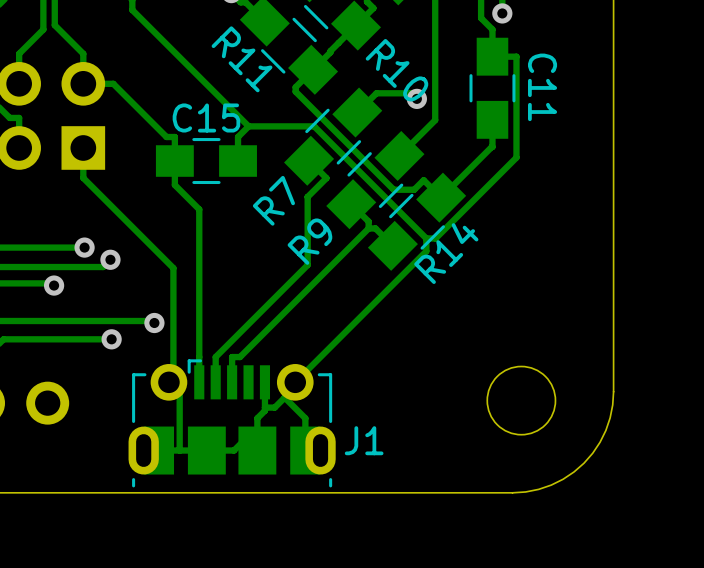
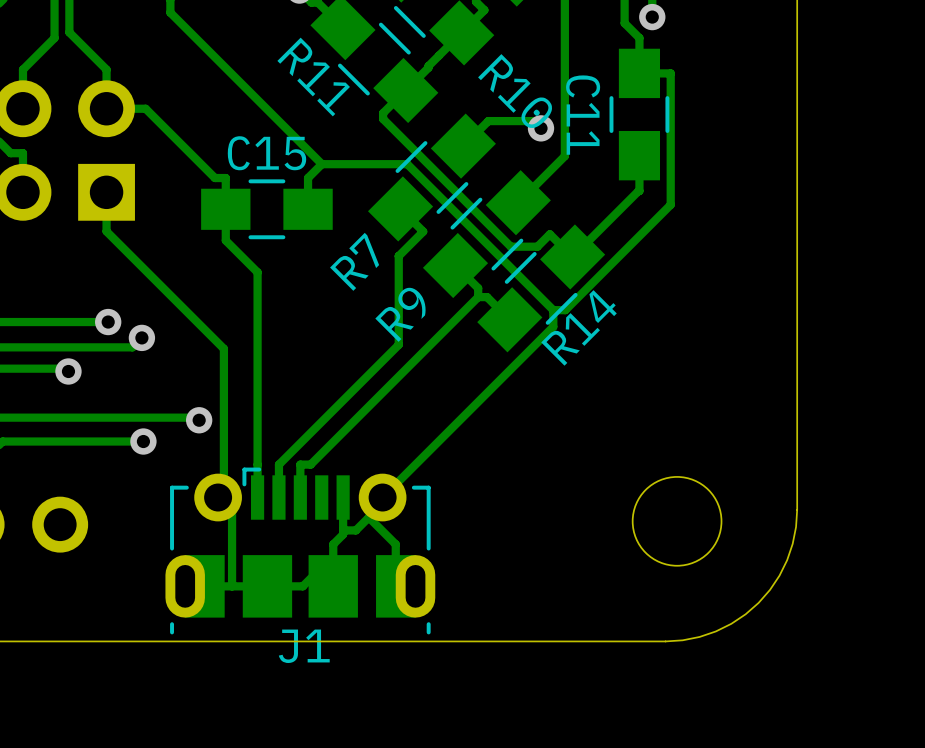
C11 name position: C11 (542, 87) -> C11 (583, 115)
J1 name position: J1 (364, 440) -> J1 (304, 646)

